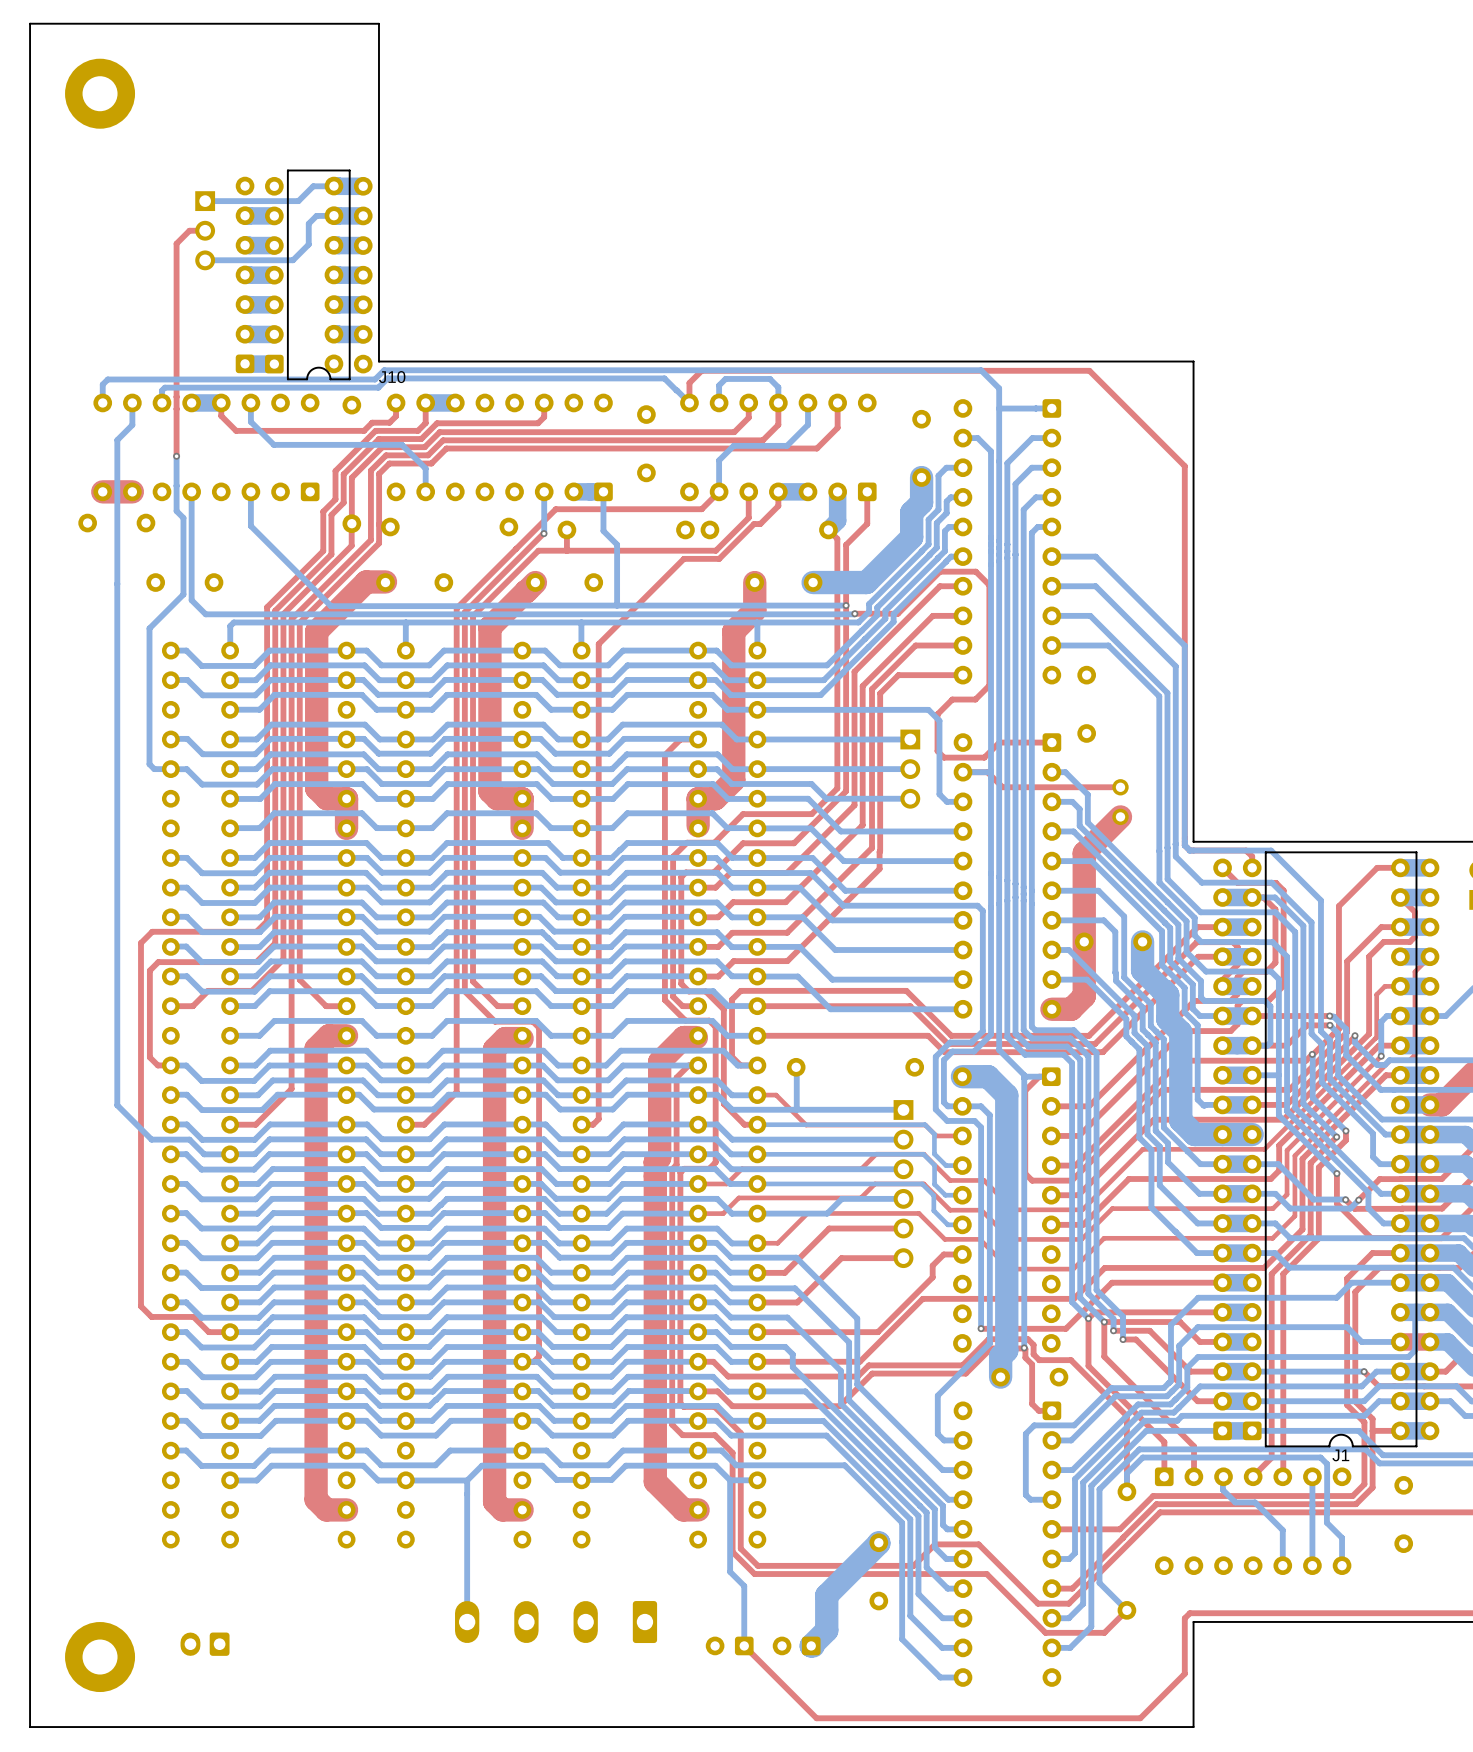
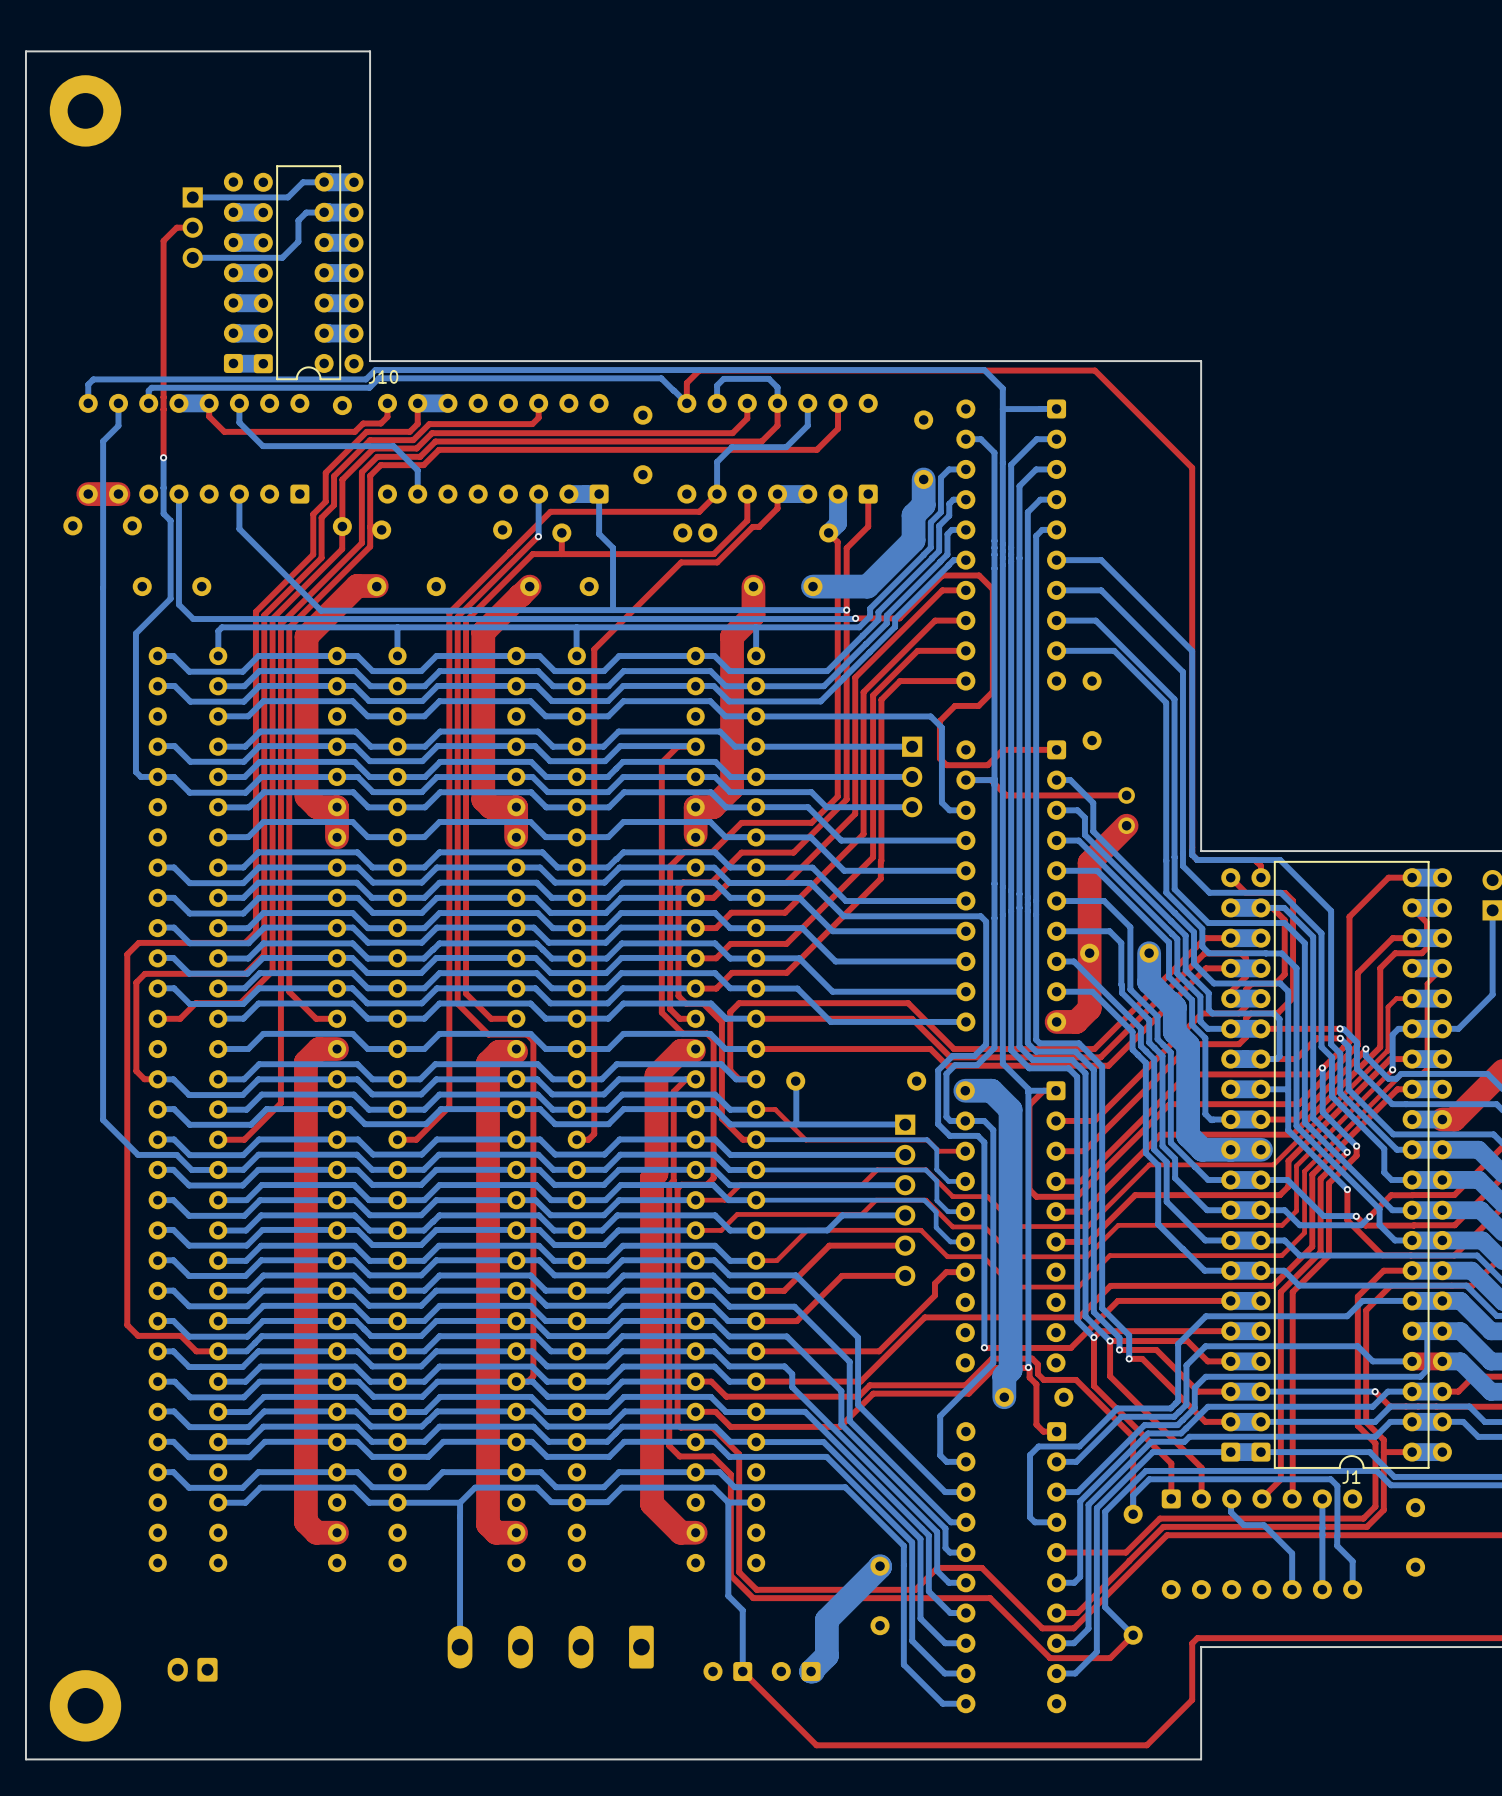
board edge: (378, 57) (378, 23) (30, 23) (30, 1727) (1193, 1727) -> (370, 51) (25, 51) (25, 1759) (1201, 1759) (1201, 1754)
part position: (100, 93) -> (85, 110)
part position: (100, 1657) -> (85, 1705)

